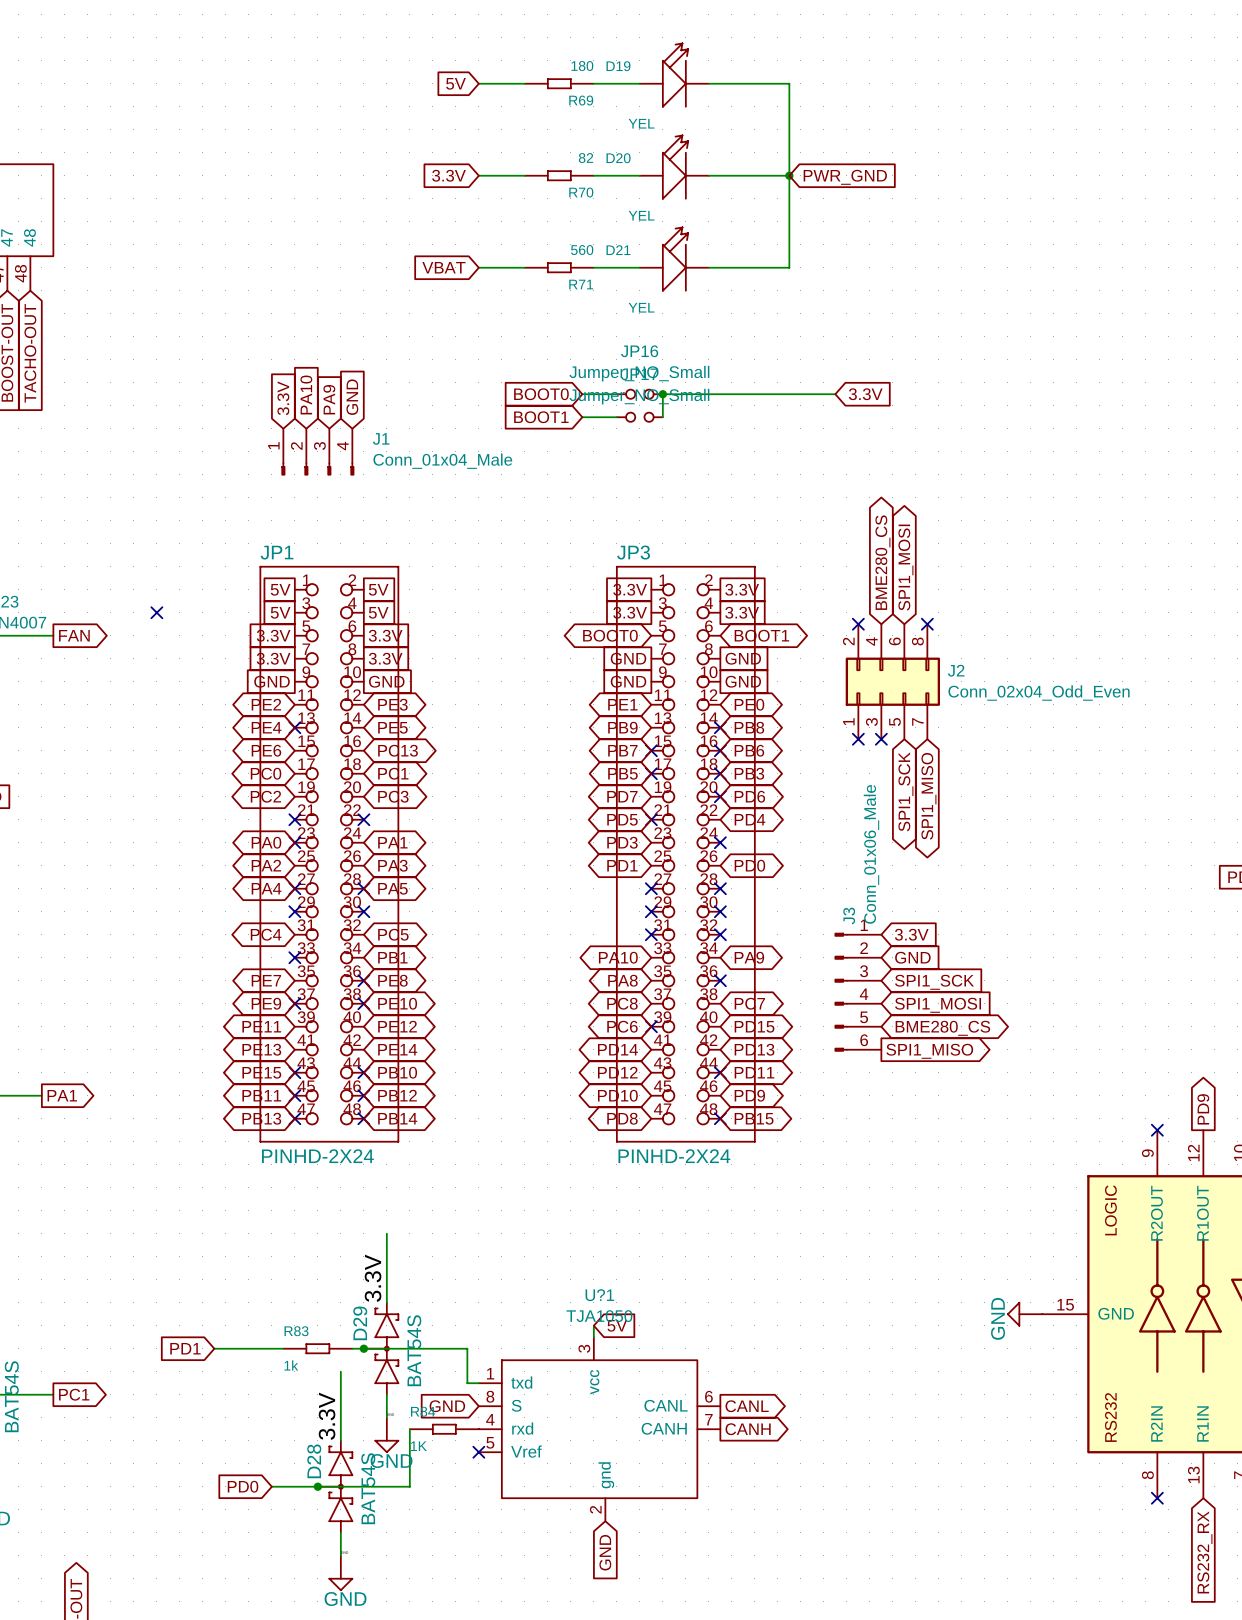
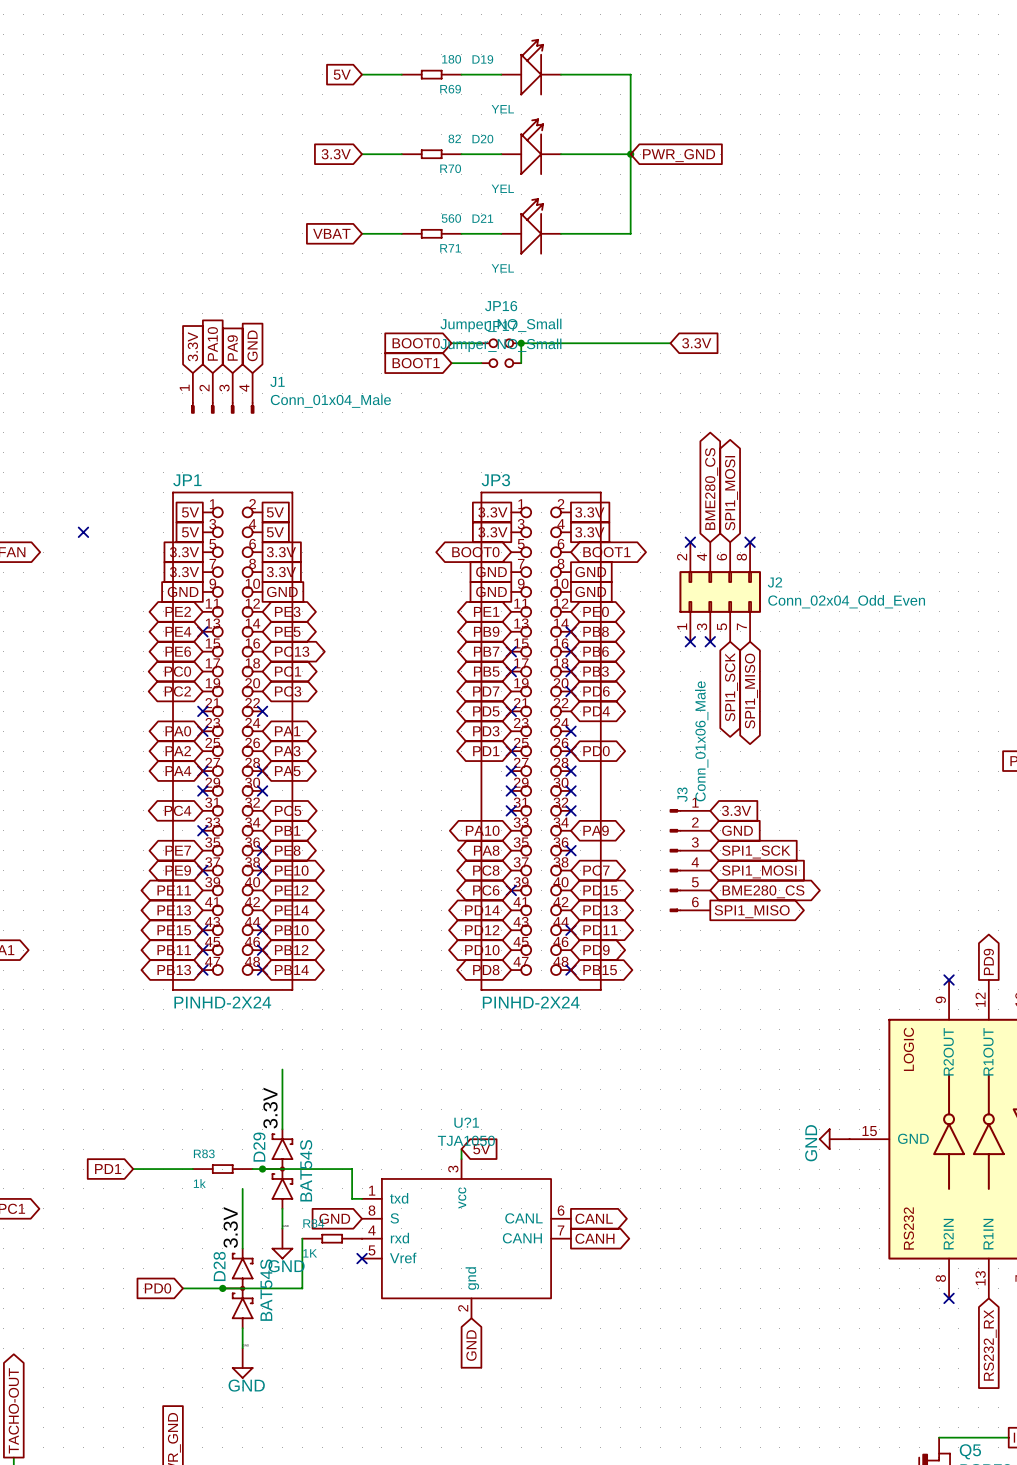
no-connect mark: none -> (511, 751)
no-connect mark: none -> (570, 751)

